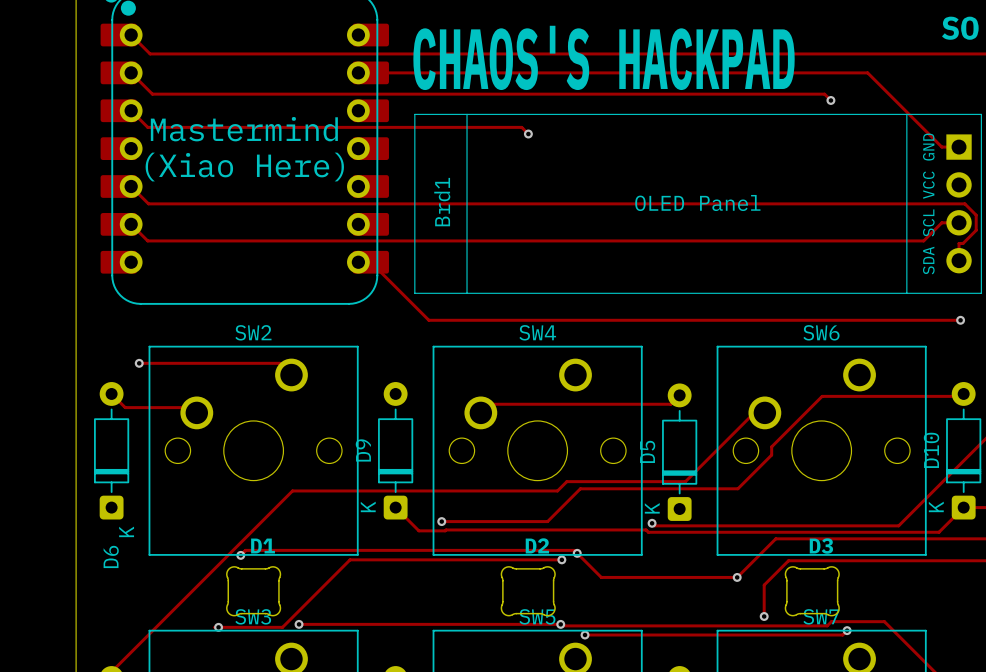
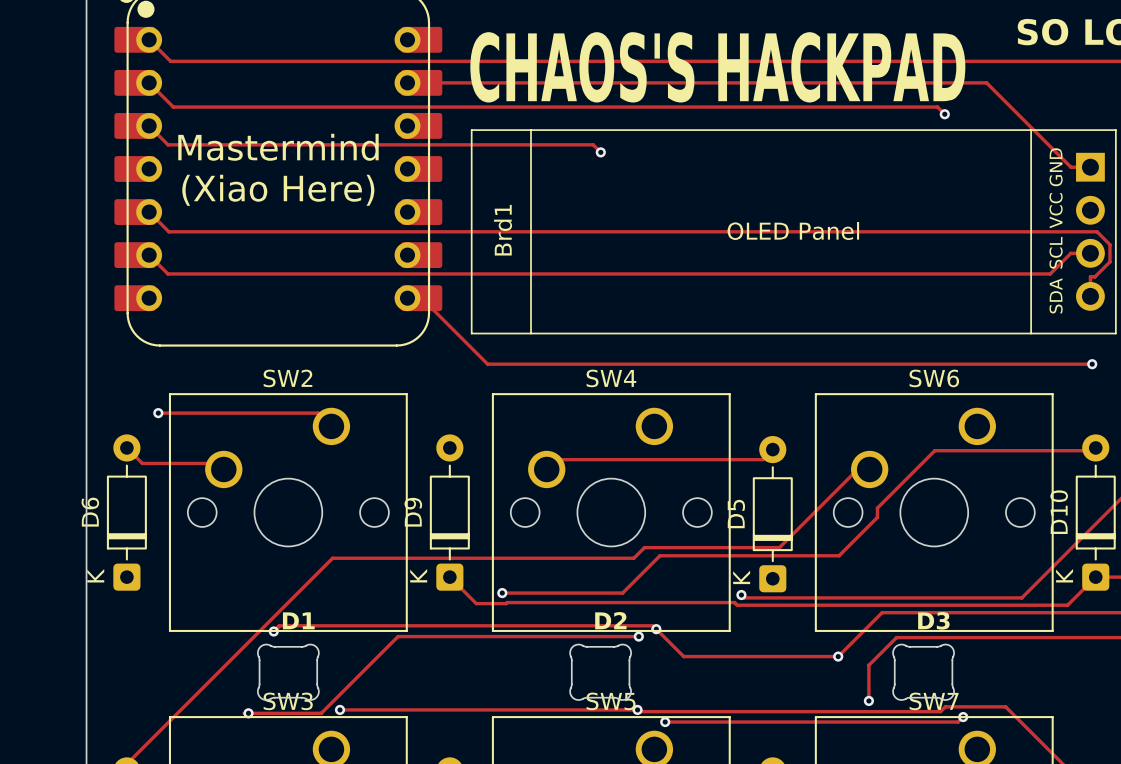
D6 text position: K (126, 531) -> K (95, 575)
D6 name position: D6 (111, 556) -> D6 (90, 512)

